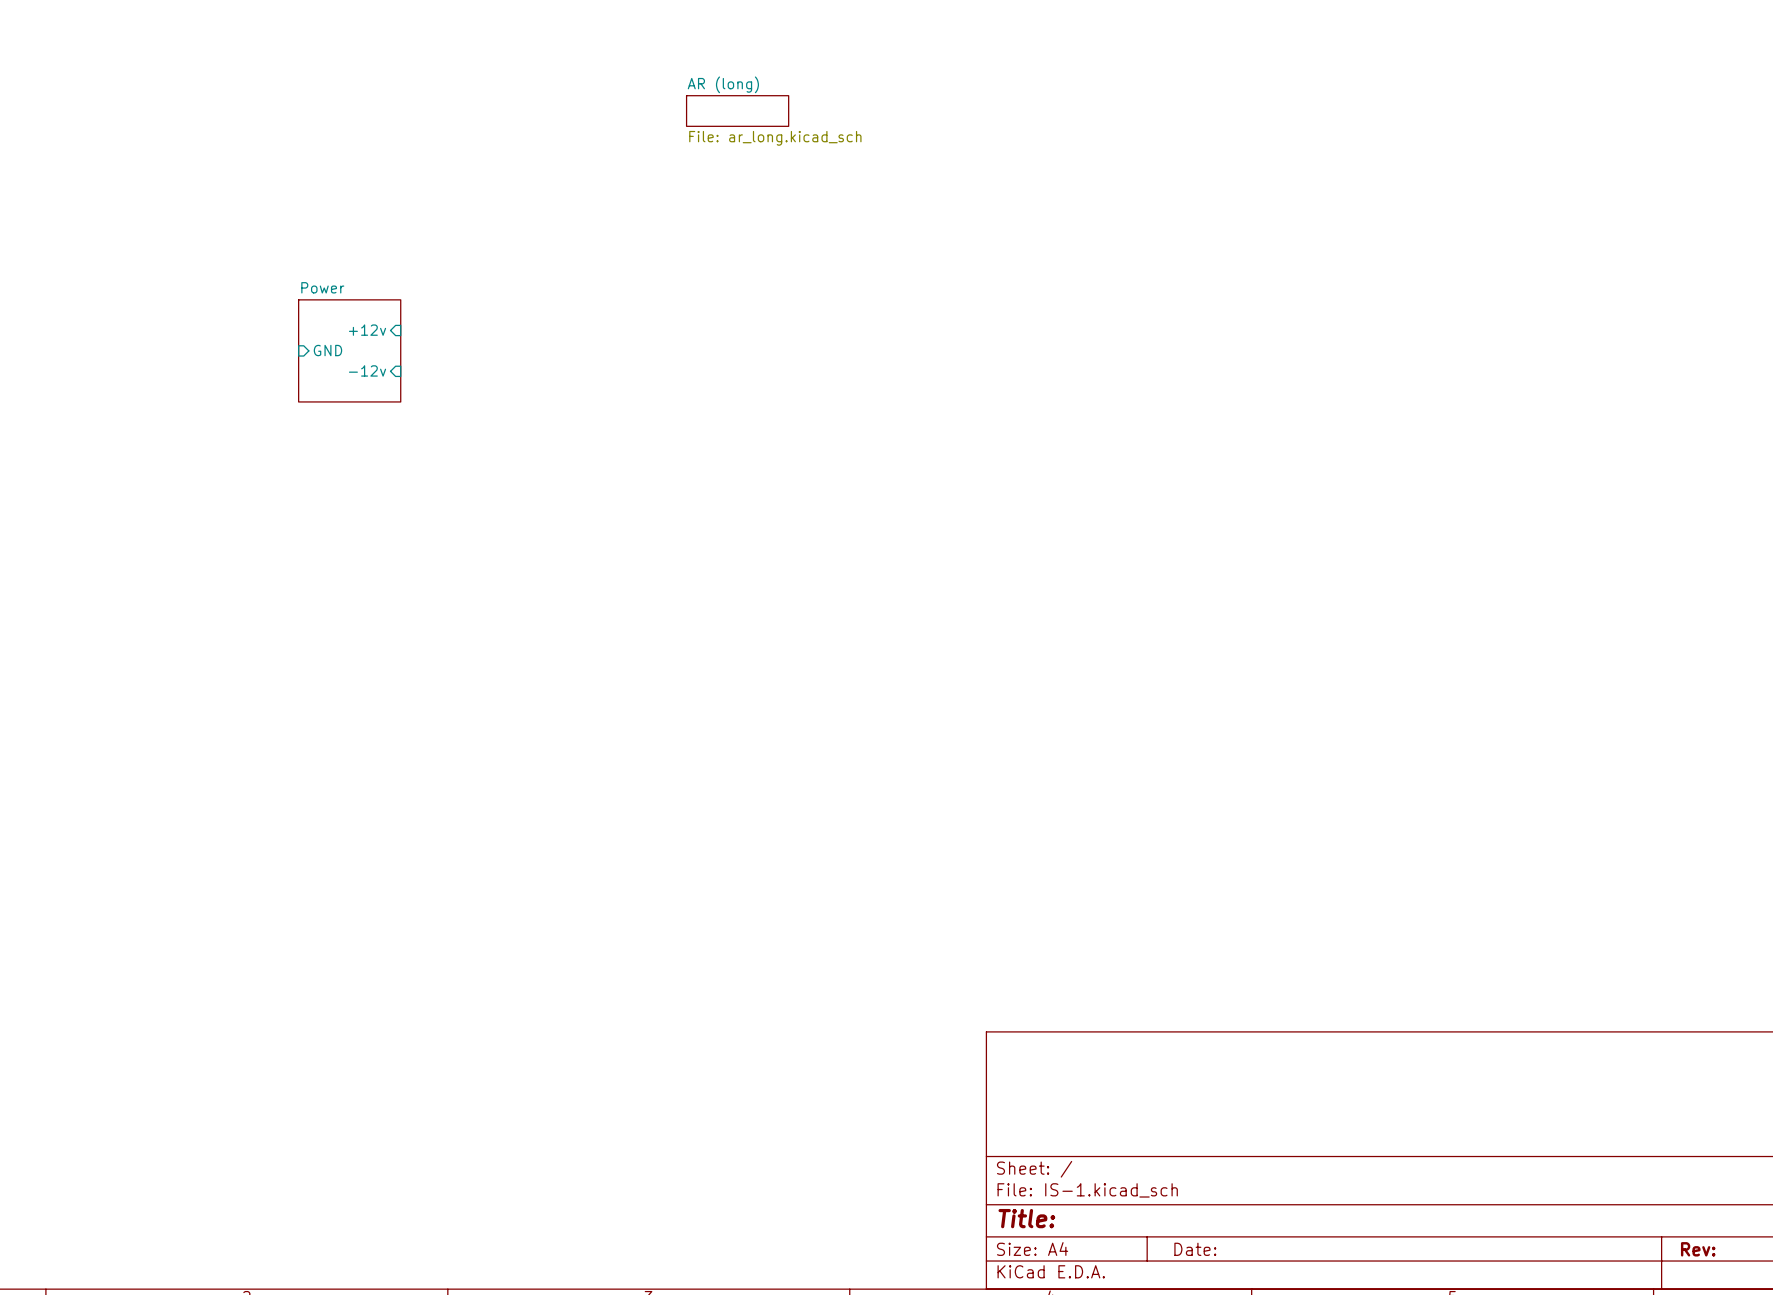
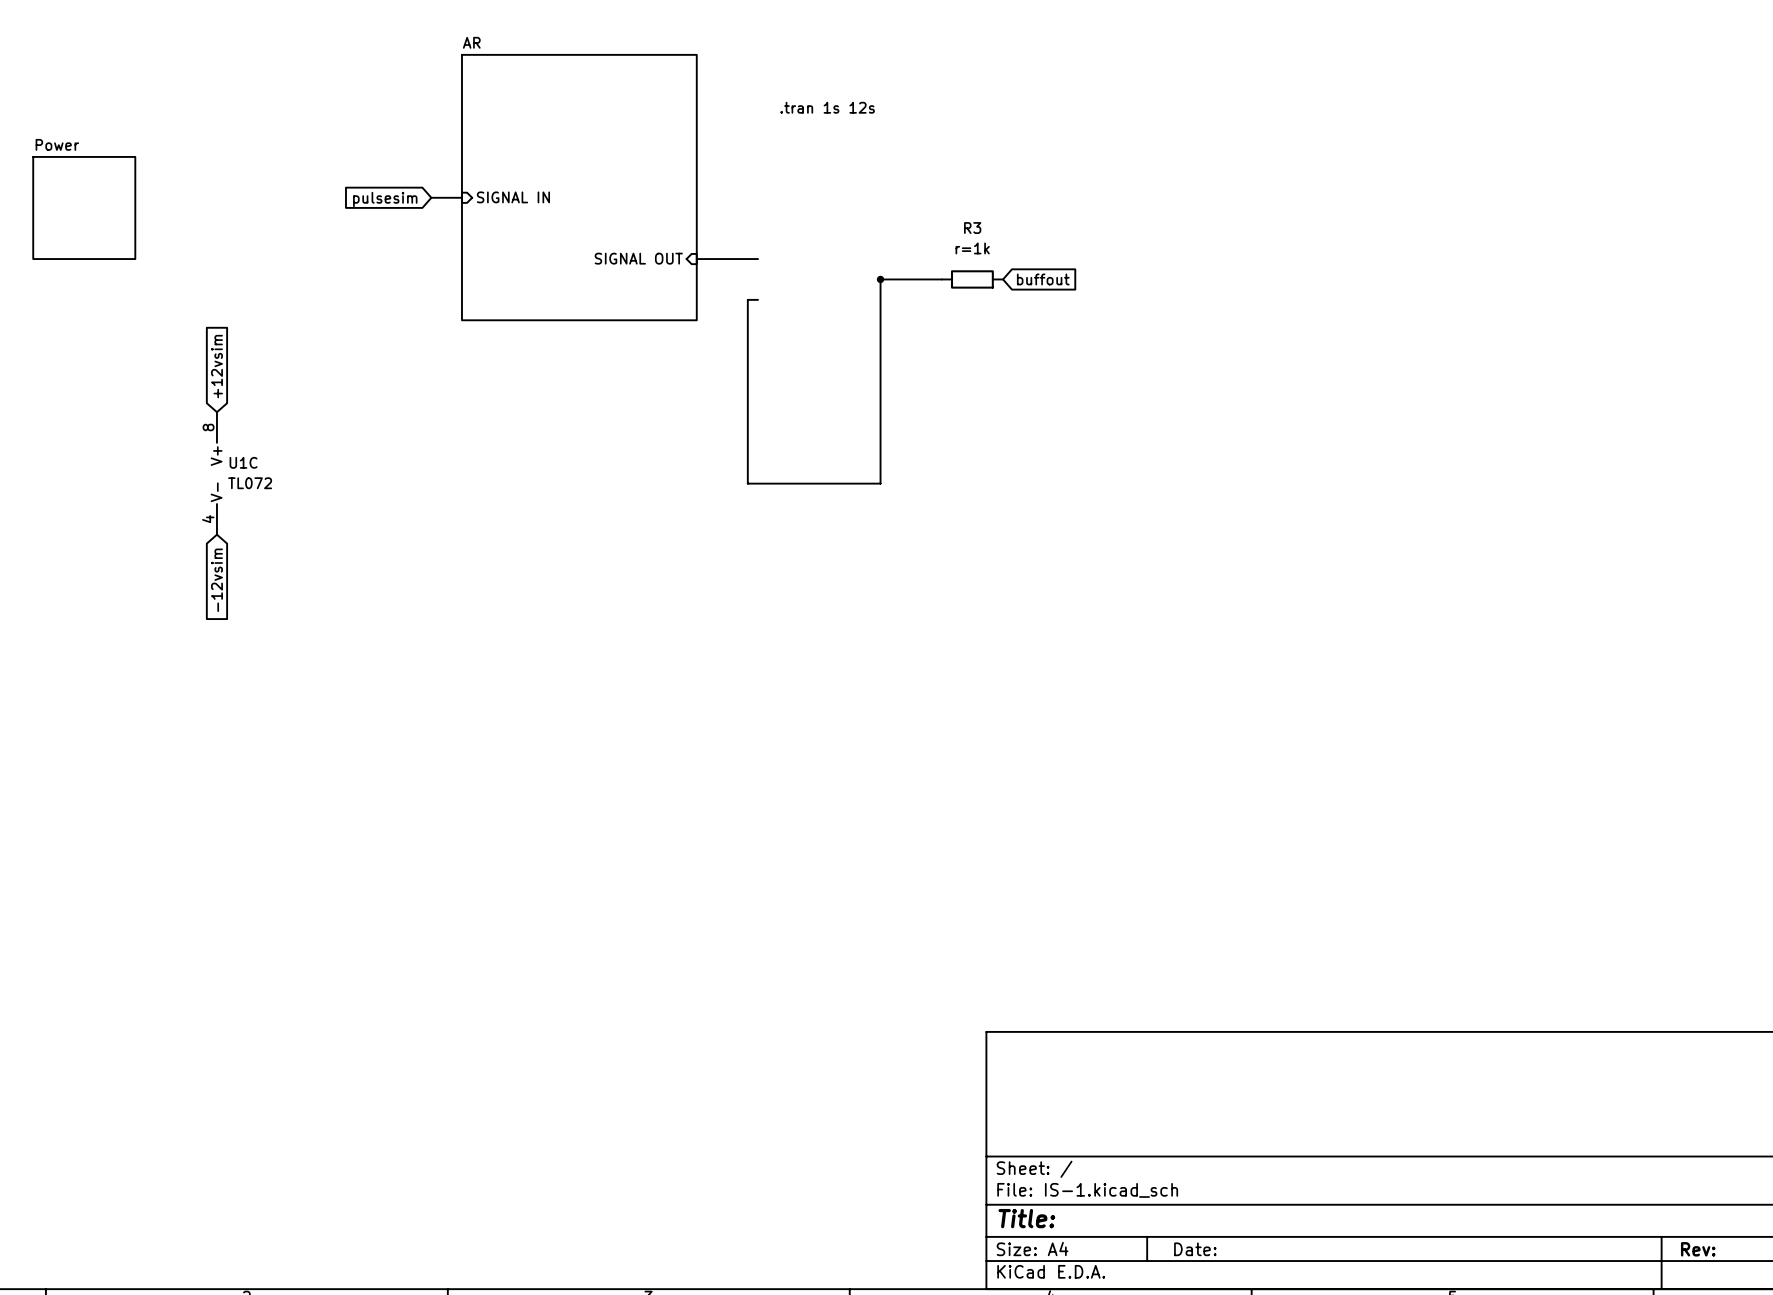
text: none -> .tran 1s 12s (827, 107)
sheet AR (long): File: ar_long.kicad_sch (737, 111) -> none
sheet AR: none -> (579, 187)
wire: none -> (431, 197) (461, 197)
sheet pin: none -> SIGNAL IN (513, 197)
global label: none -> pulsesim (385, 199)
sheet Power: none -> (84, 207)
sheet pin: none -> SIGNAL OUT (638, 258)
wire: none -> (696, 259) (758, 259)
junction: none -> (880, 279)
wire: none -> (941, 279) (880, 279) (880, 483) (747, 483) (747, 299) (758, 299)
R3: none -> r=1k (972, 279)
global label: none -> buffout (1043, 279)
sheet pin: +12v (367, 330) -> none
sheet pin: GND (327, 350) -> none
sheet Power: (349, 350) -> none
global label: none -> +12vsim (216, 366)
sheet pin: -12v (367, 370) -> none
U1C: none -> TL072 (216, 473)
global label: none -> -12vsim (216, 580)

